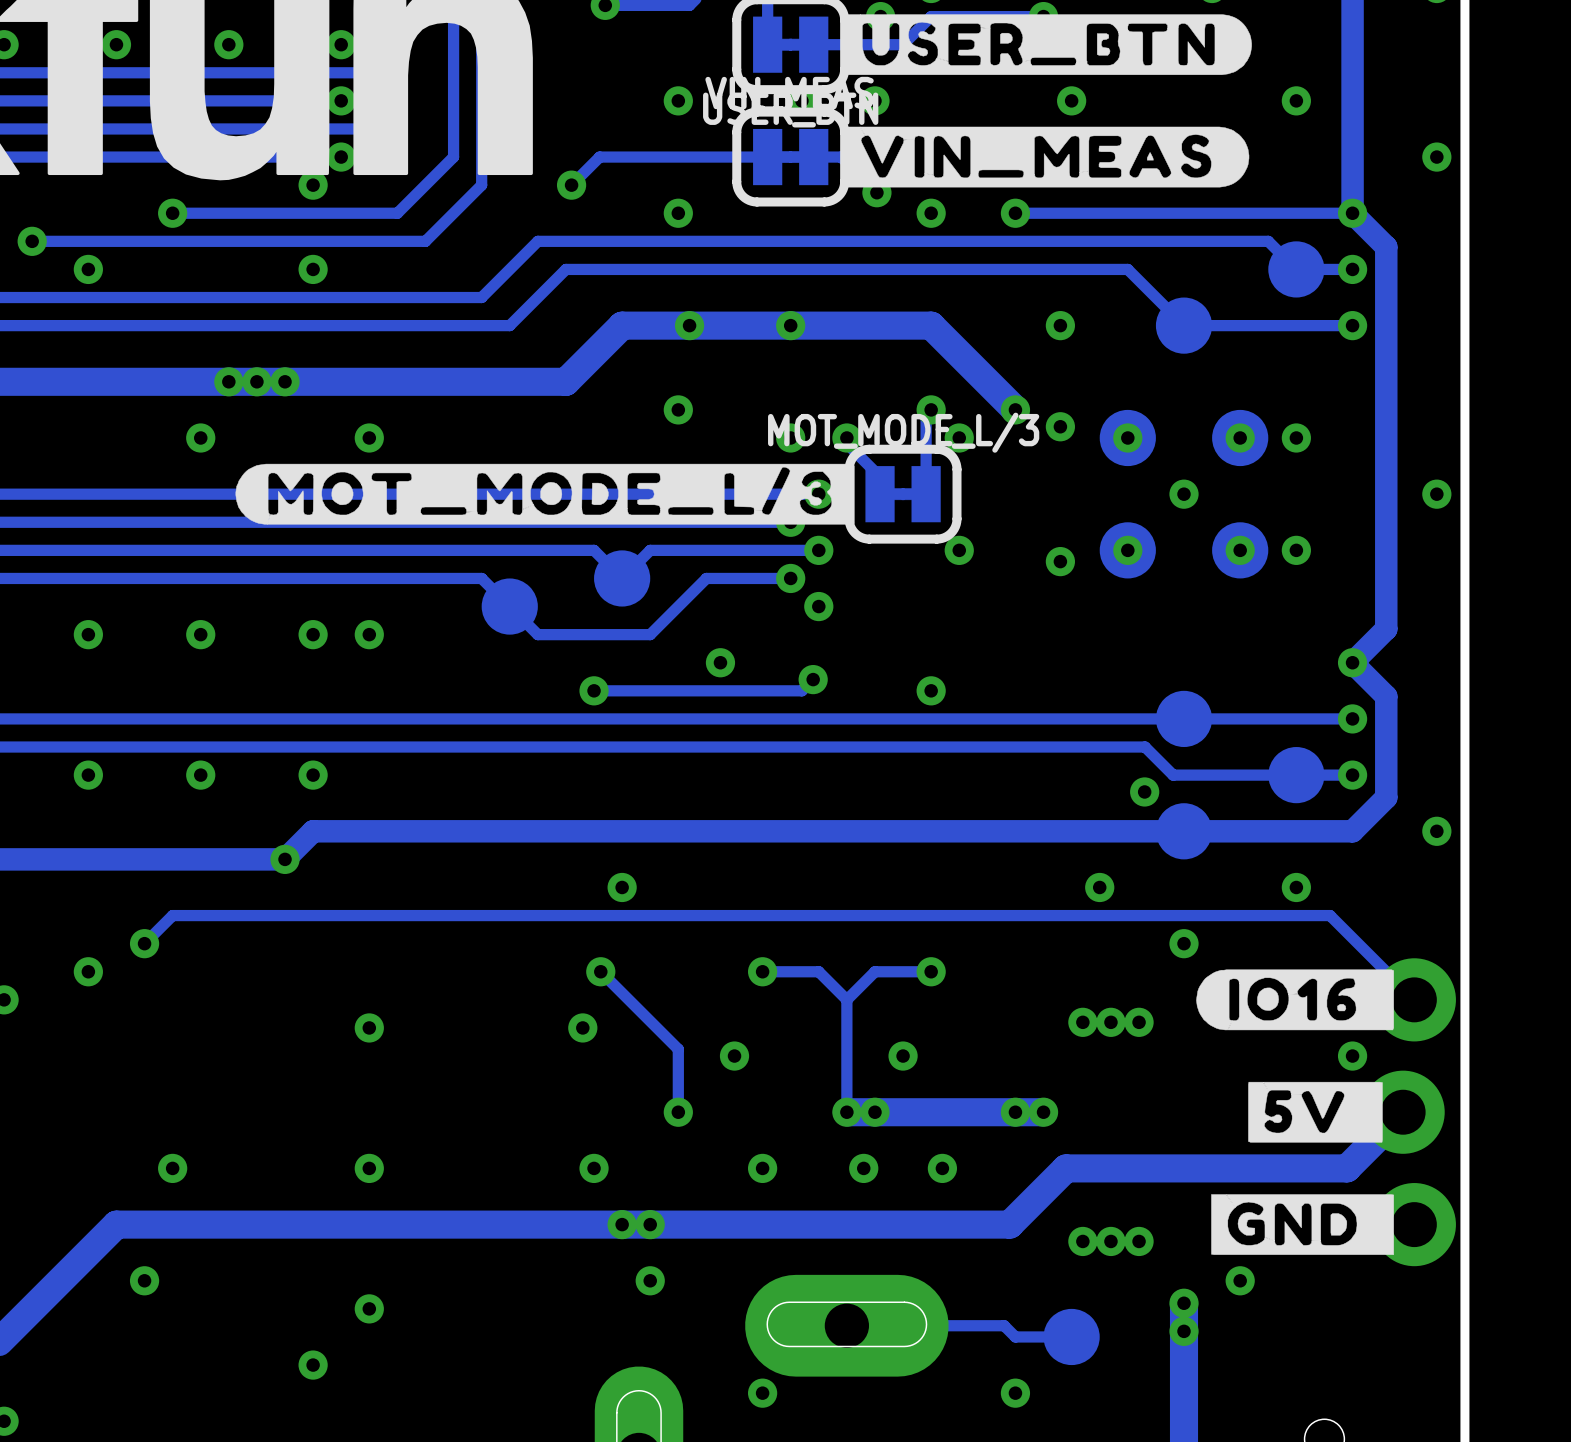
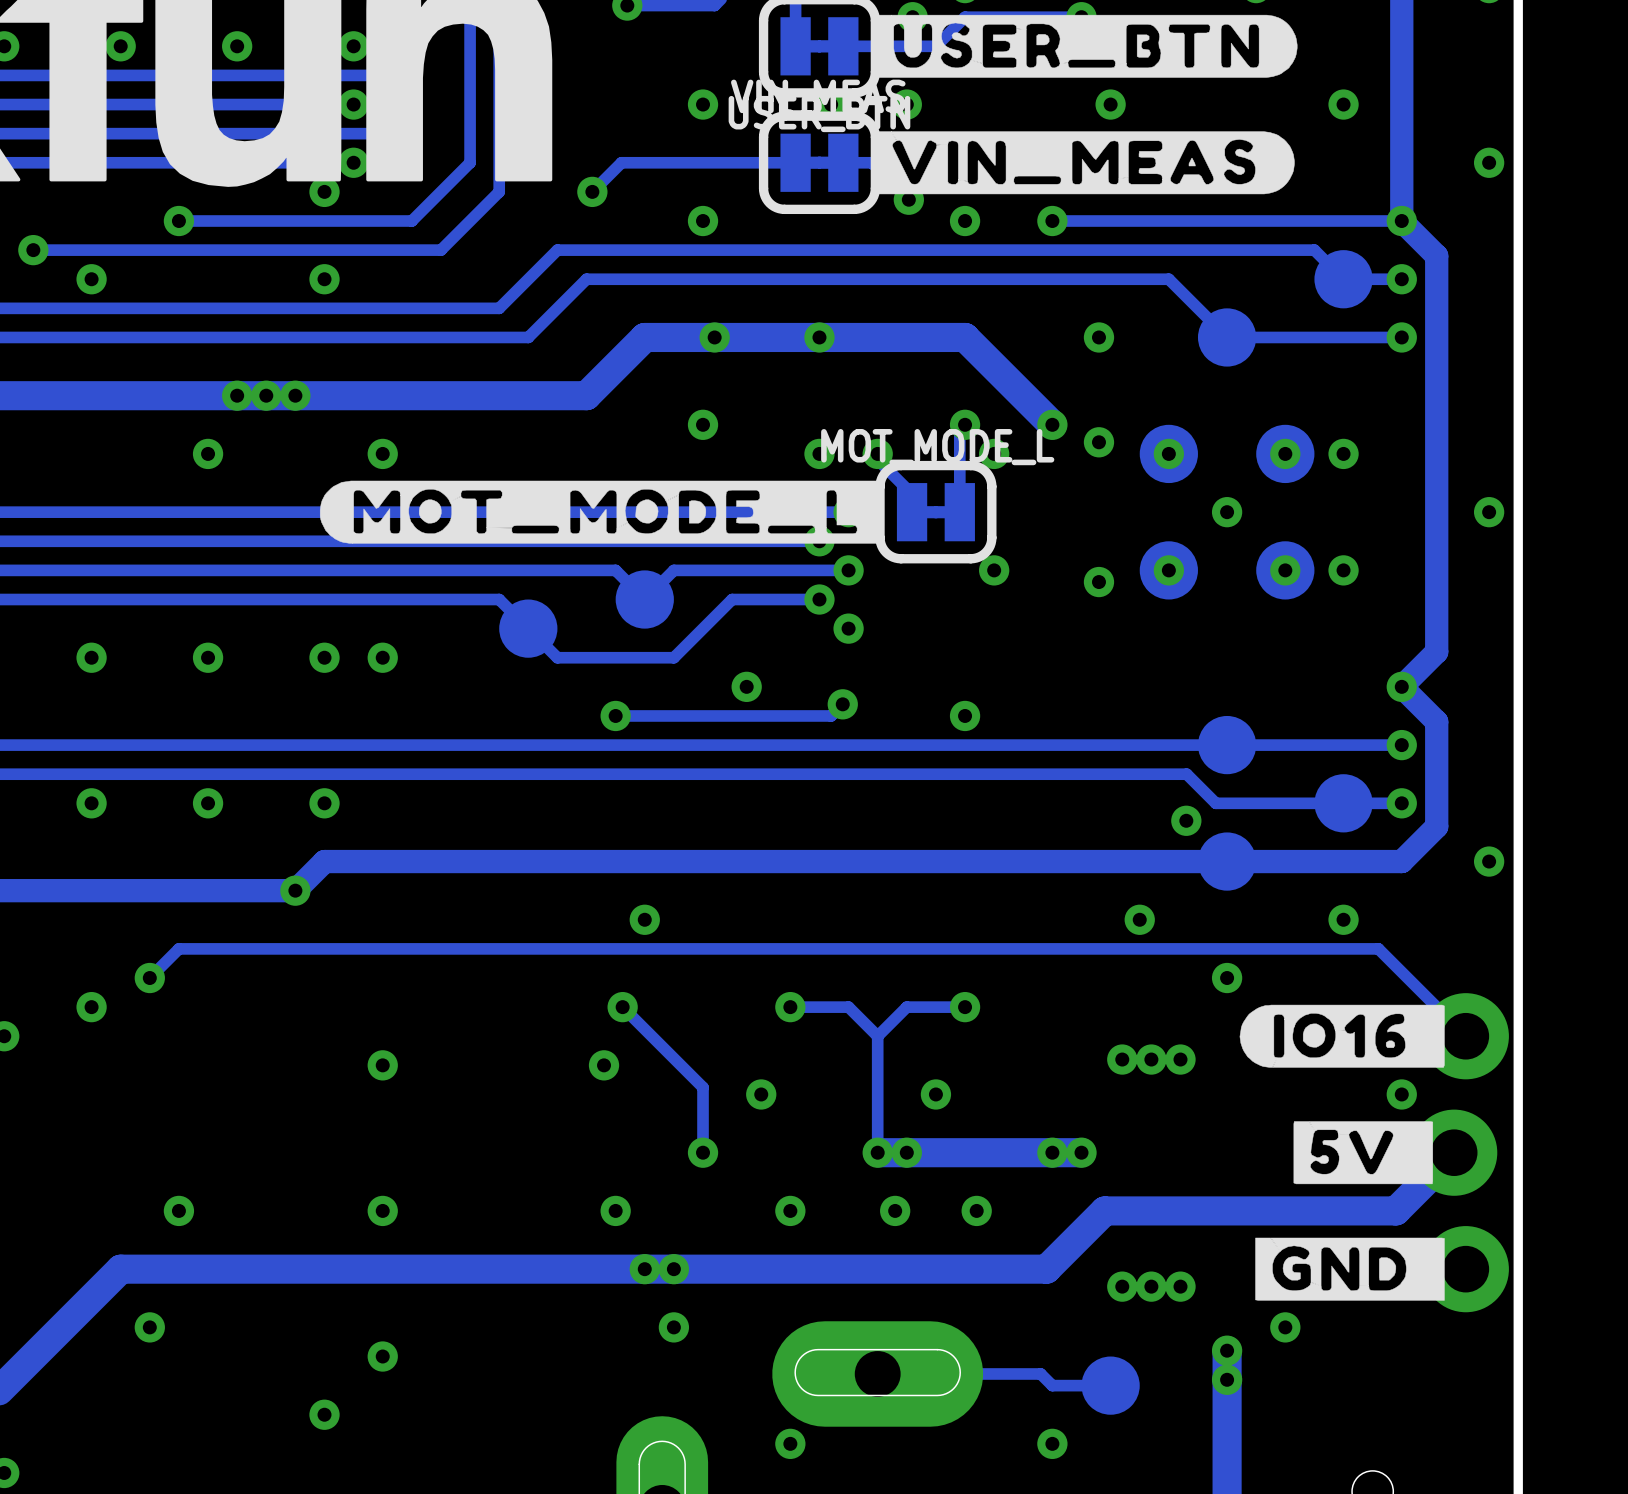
MOT_MODE_L/3 name: MOT_MODE_L/3 (903, 432) -> MOT_MODE_L (937, 447)
drawing shape: [235, 463, 855, 525] -> [319, 480, 880, 544]

